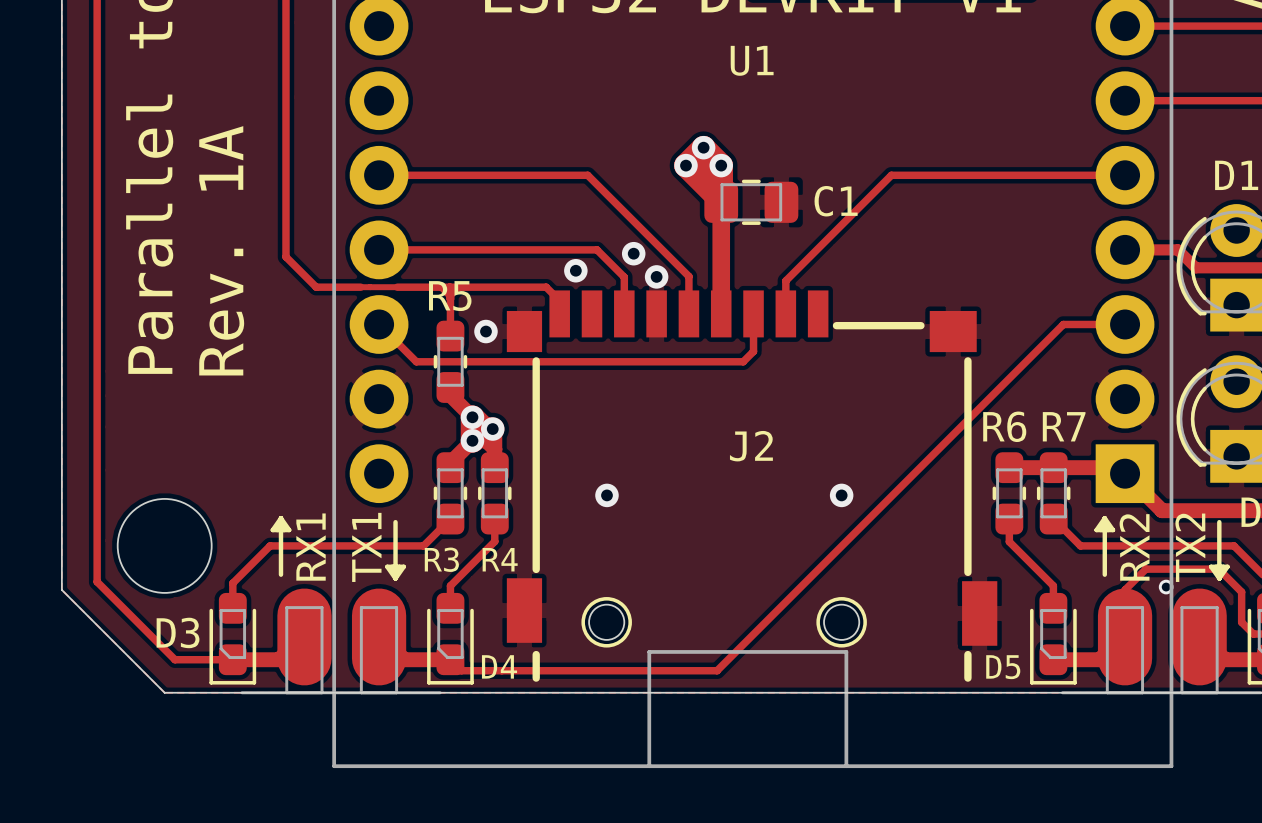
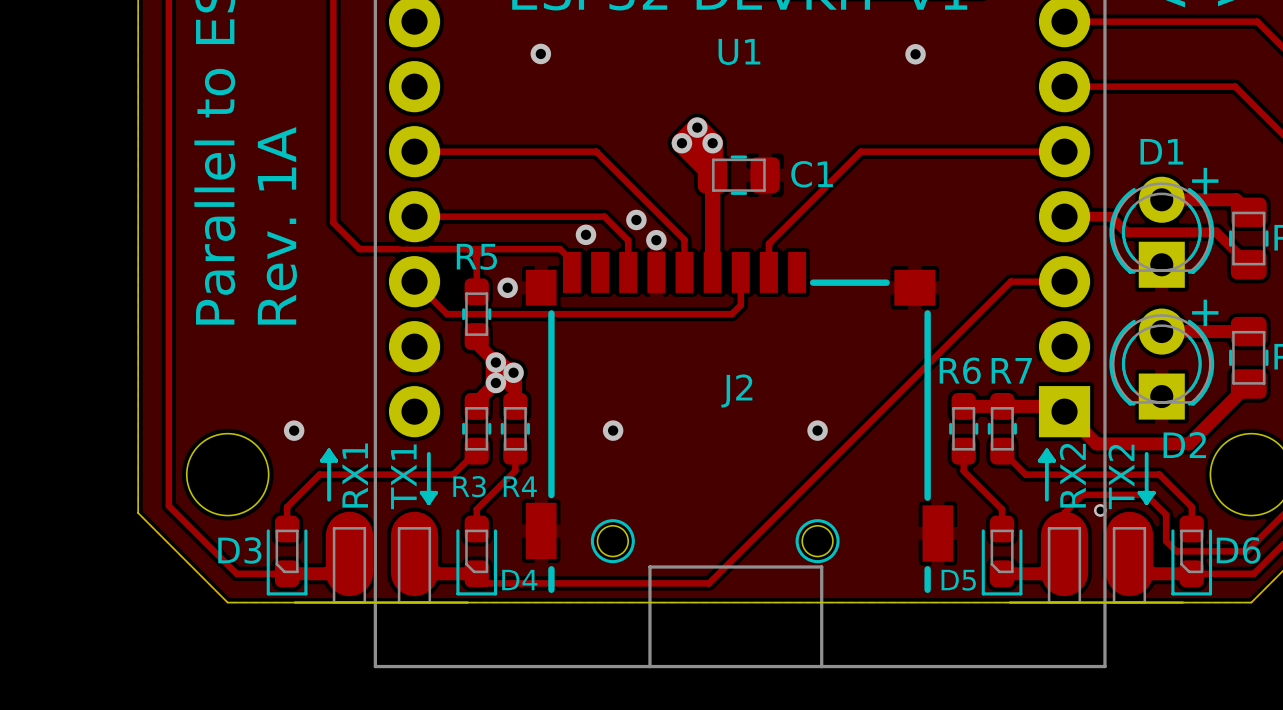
via: none -> (540, 53)
via: none -> (915, 54)
via: none -> (294, 430)

